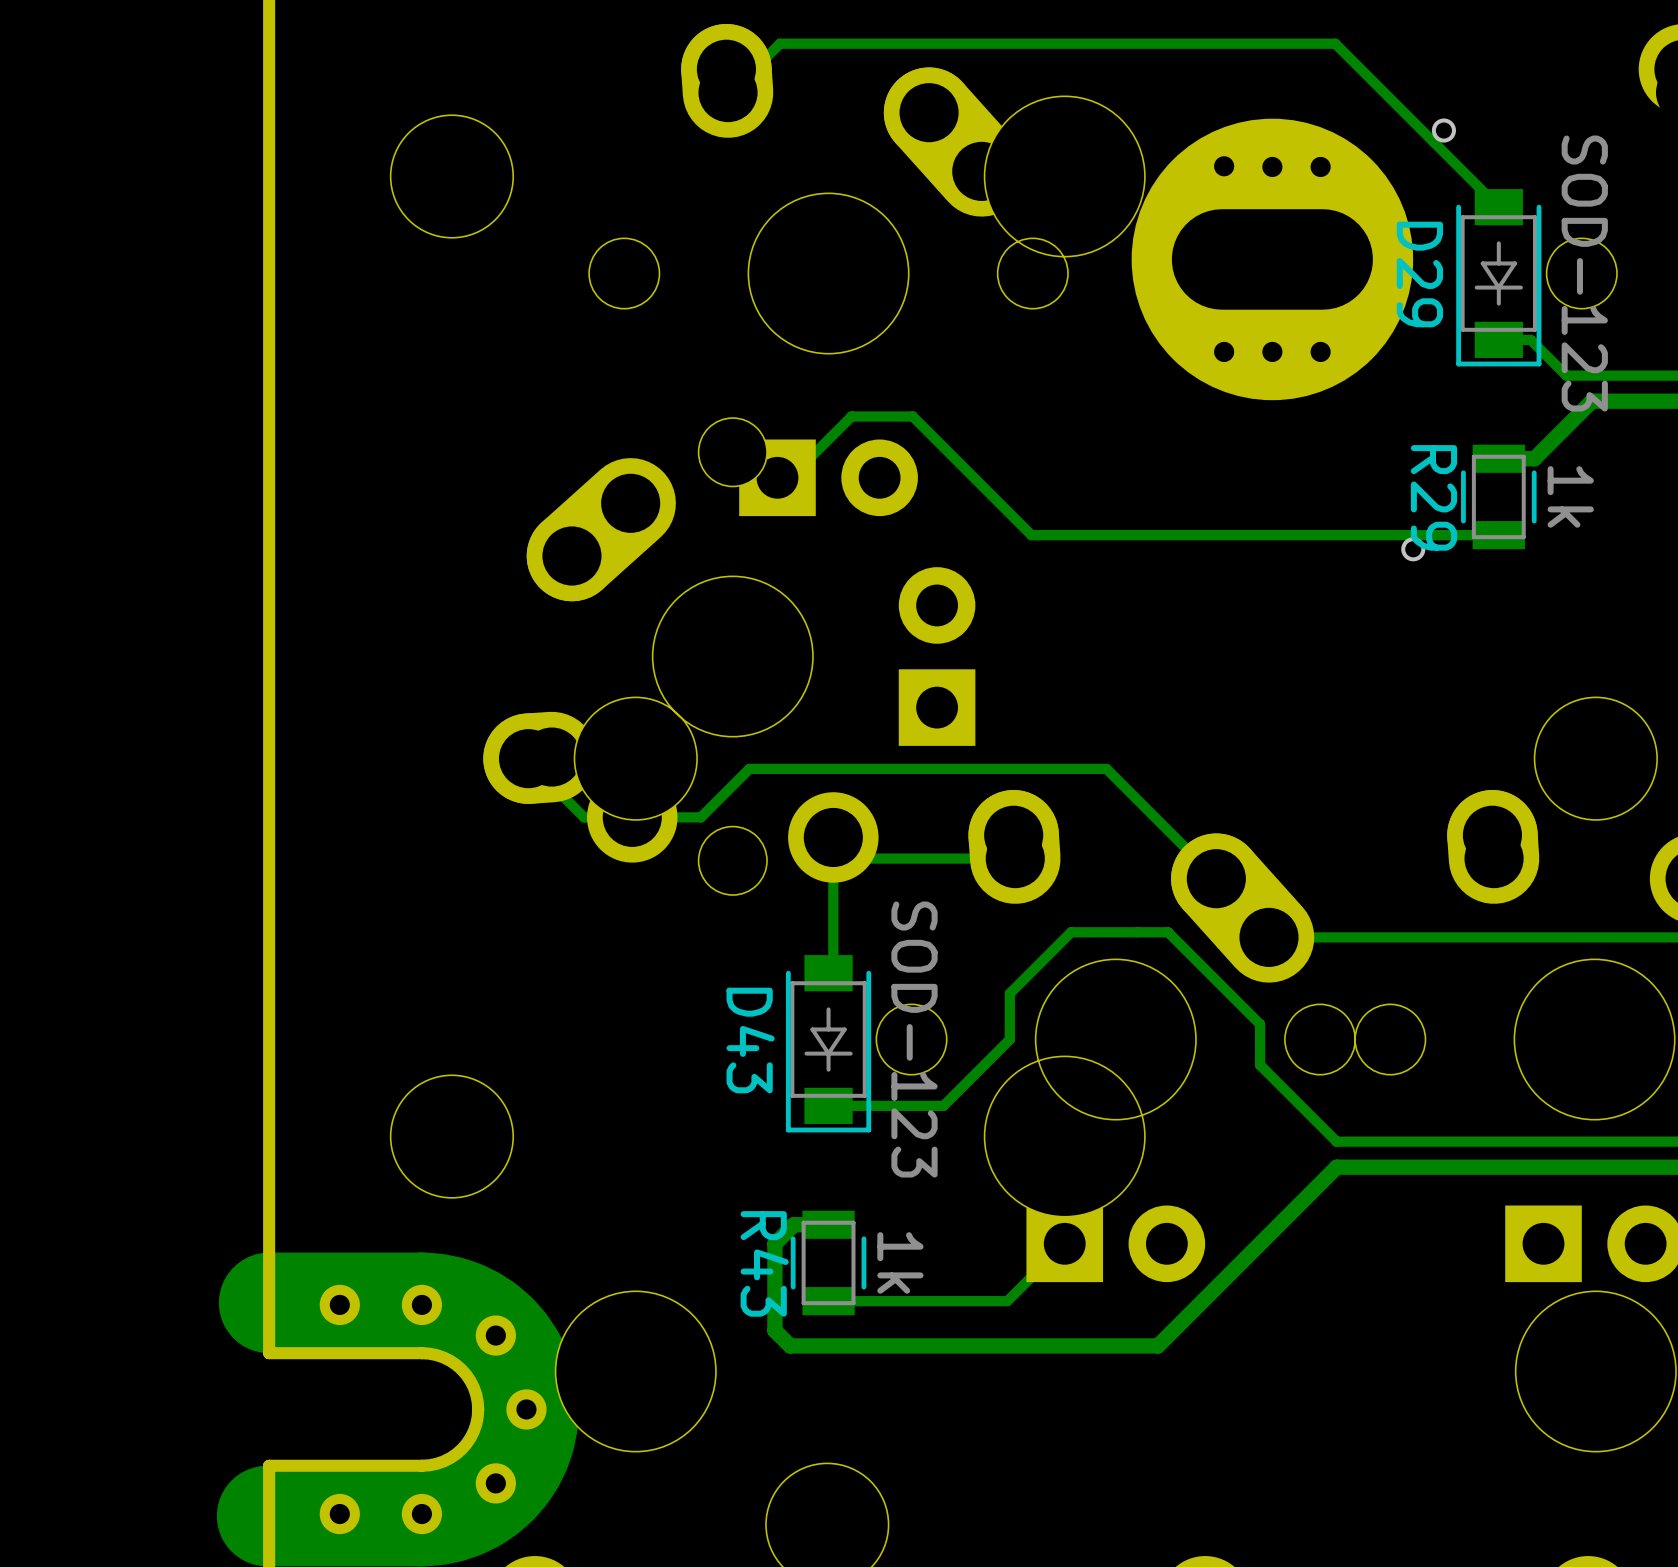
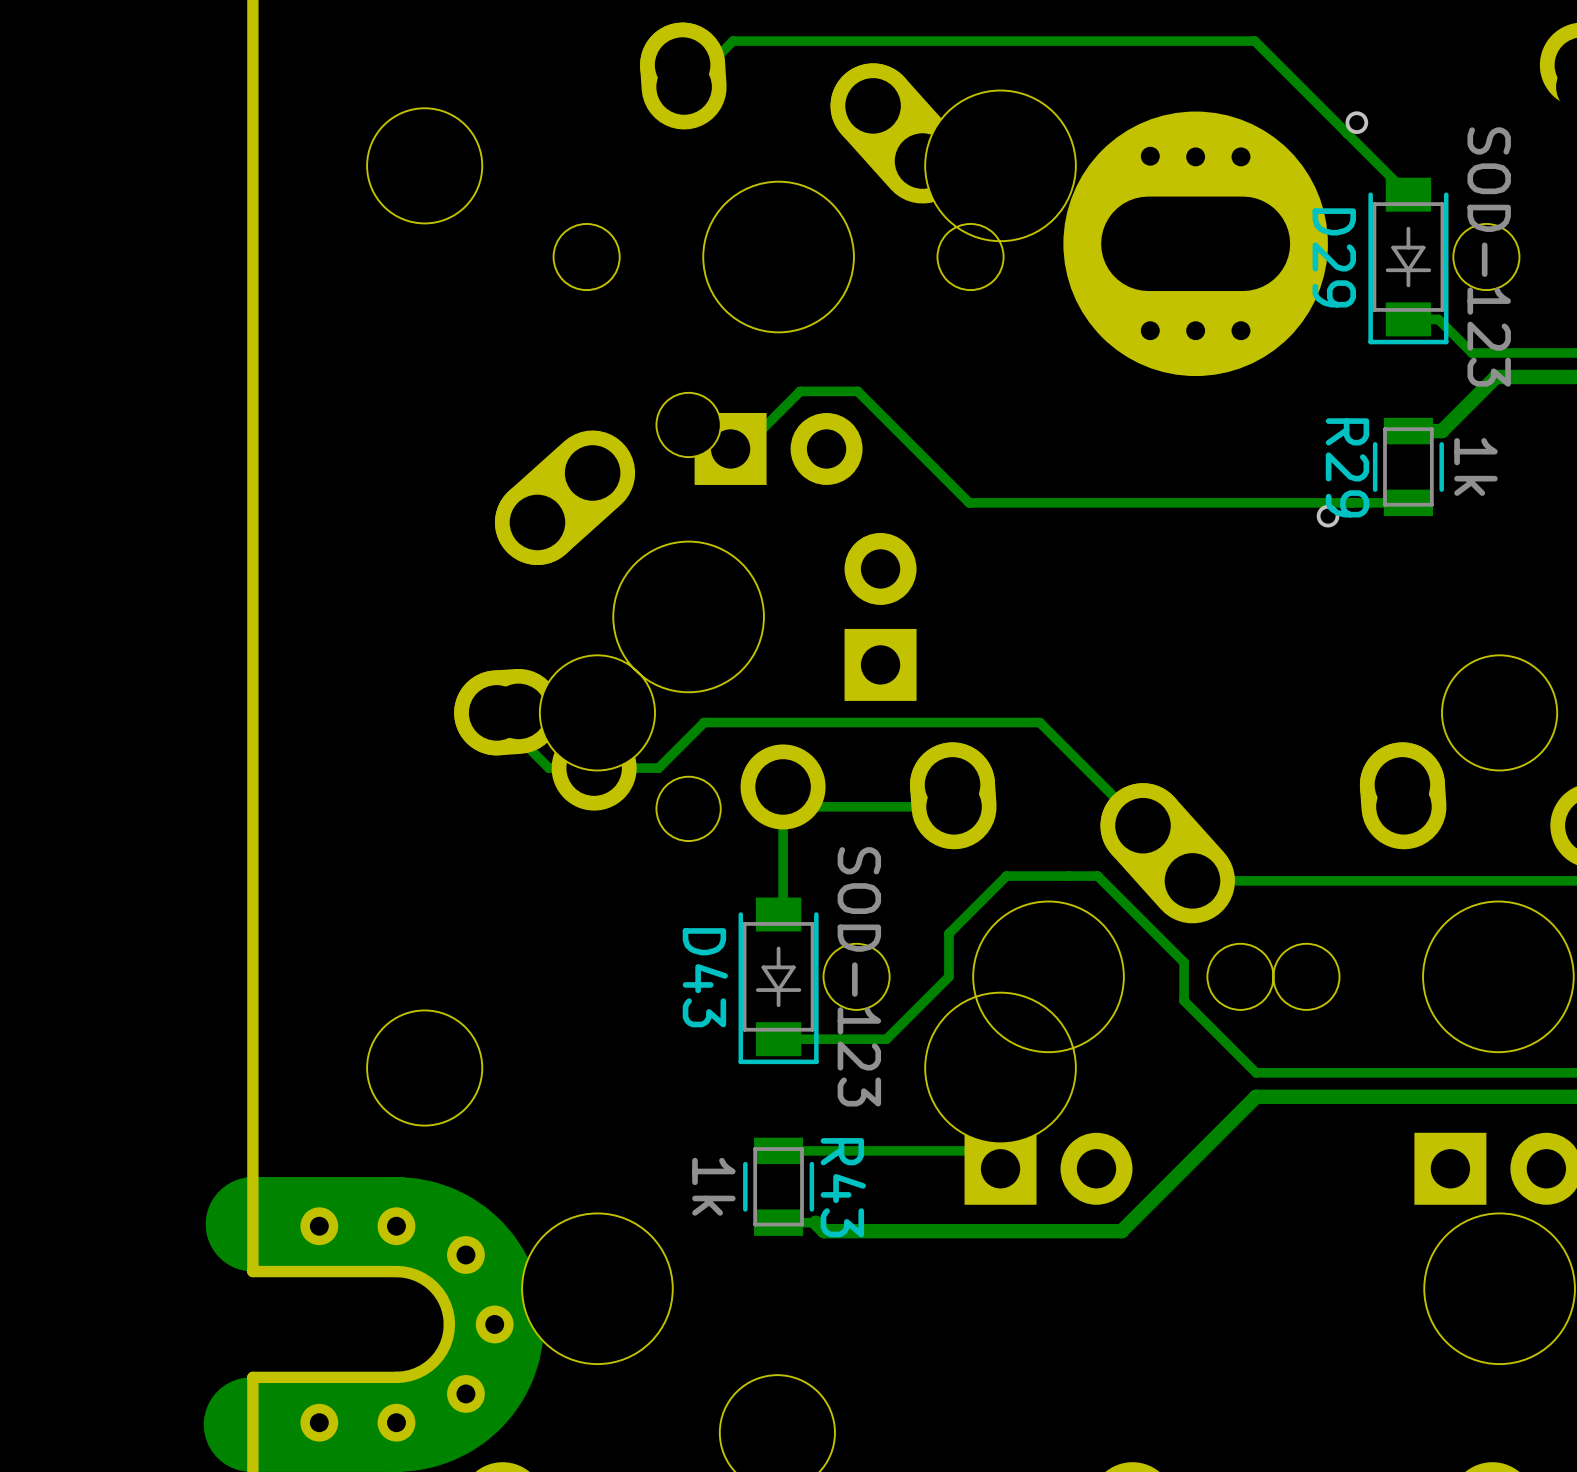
track: (828, 1224) (793, 1224) (774, 1243) (774, 1330) (790, 1345) (1157, 1345) (1193, 1310) -> (815, 1222) (824, 1231) (1121, 1231)
track: (1064, 1243) (1007, 1301) (868, 1301) -> (1000, 1168) (982, 1150) (778, 1150)
R43 value position: 1k (900, 1262) -> 1k (713, 1186)
R43 name position: R43 (764, 1263) -> R43 (843, 1187)

